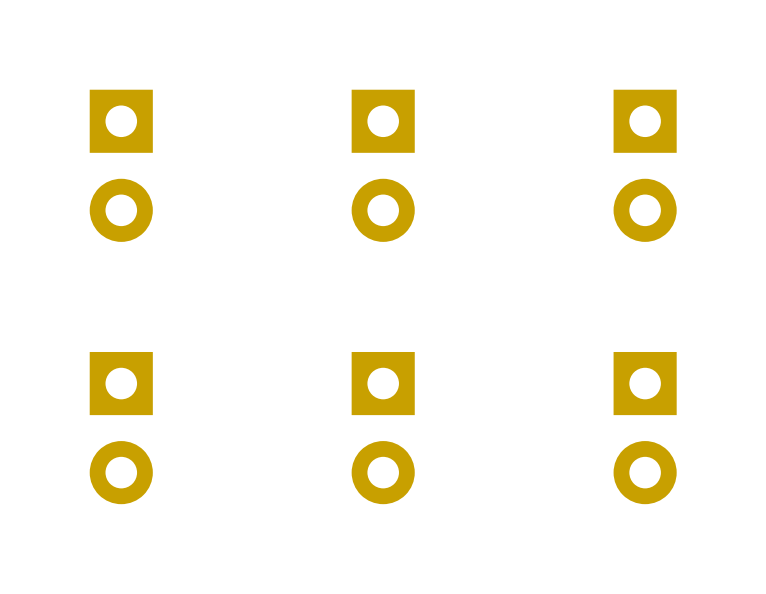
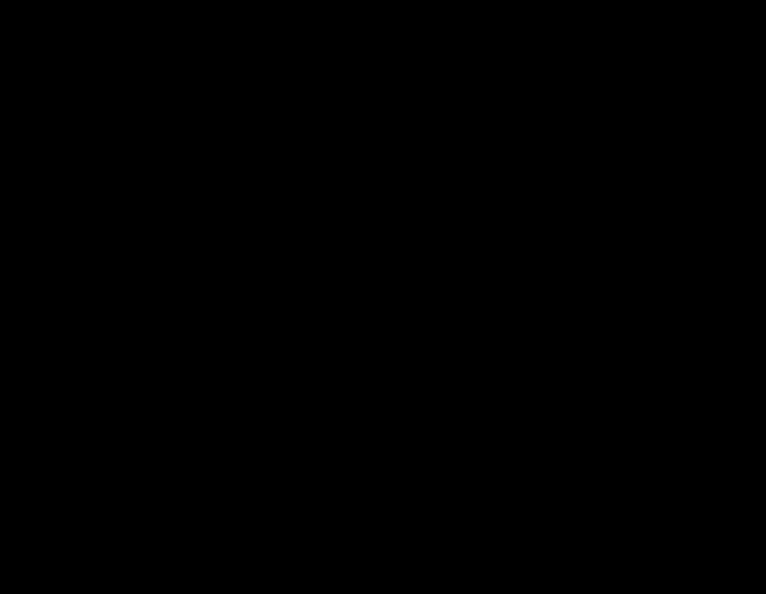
part: (121, 165) -> none
part: (383, 165) -> none
part: (645, 165) -> none
part: (121, 428) -> none
part: (383, 428) -> none
part: (645, 428) -> none

